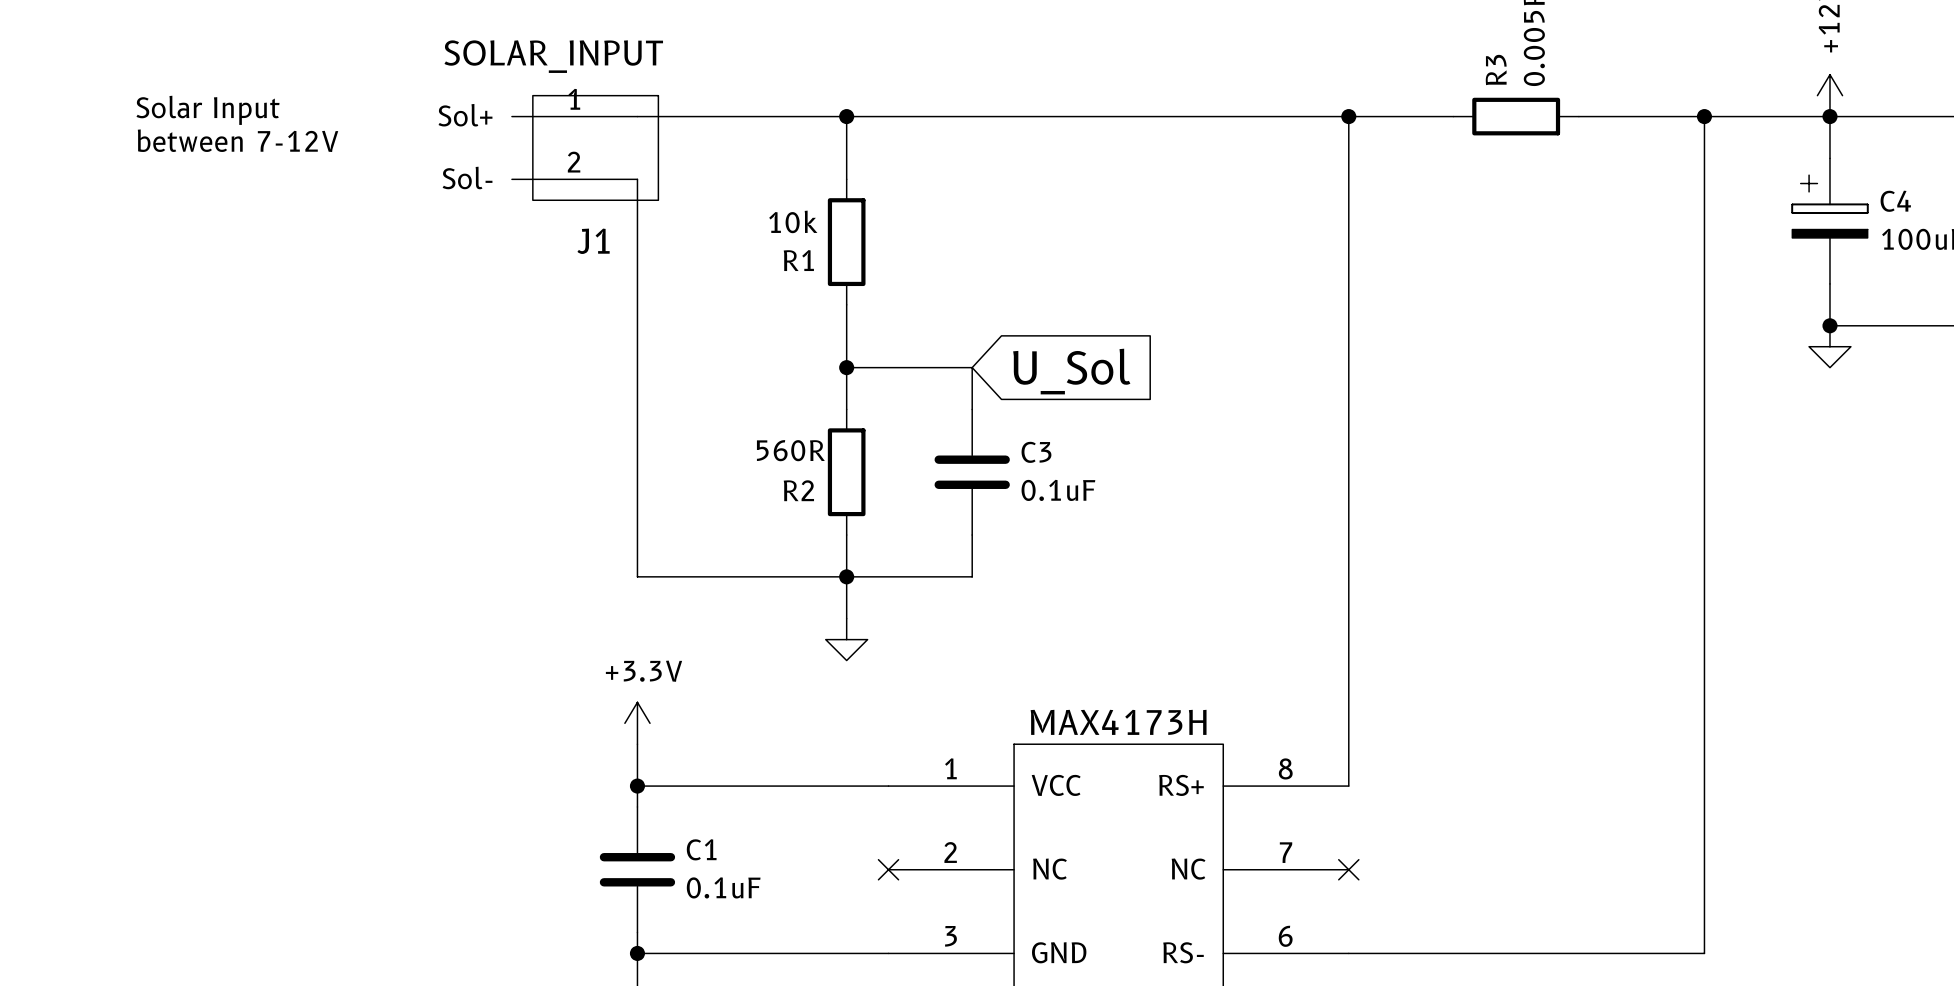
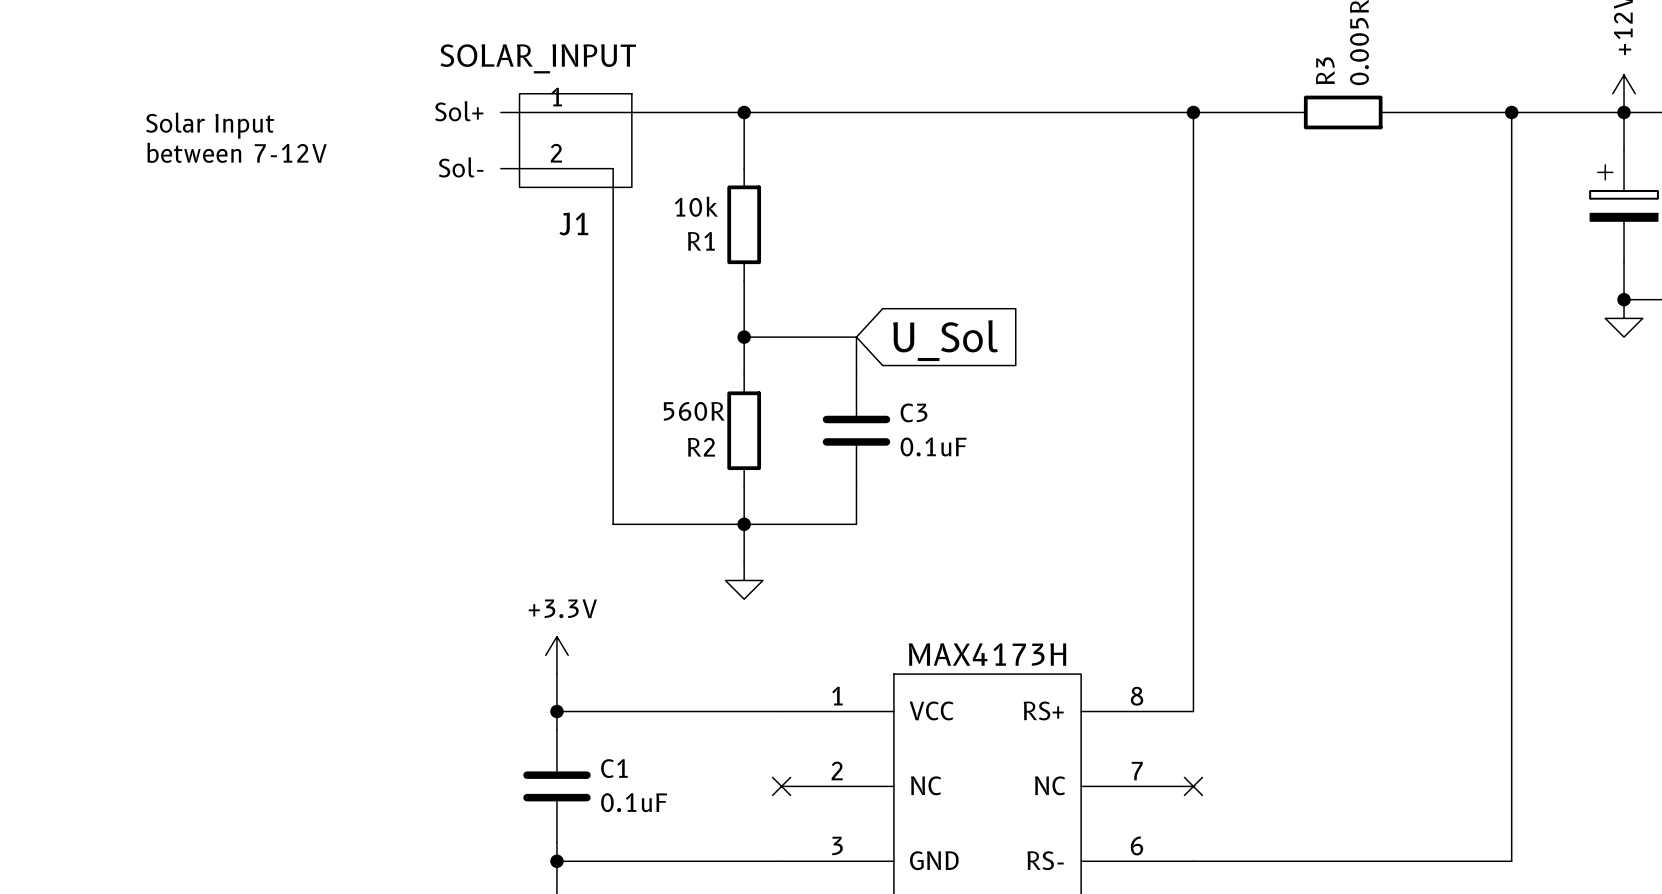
text position: Solar Input (207, 110) -> Solar Input (210, 125)
text position: between 7-12V (238, 140) -> between 7-12V (237, 152)
J1 position: (585, 147) -> (566, 140)
wire: (637, 179) (637, 576) (700, 576) -> (613, 168) (613, 524)

